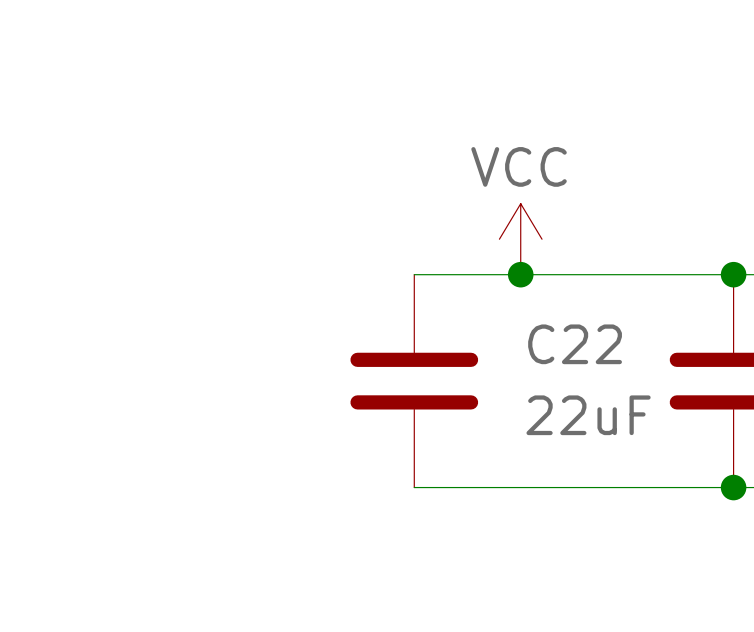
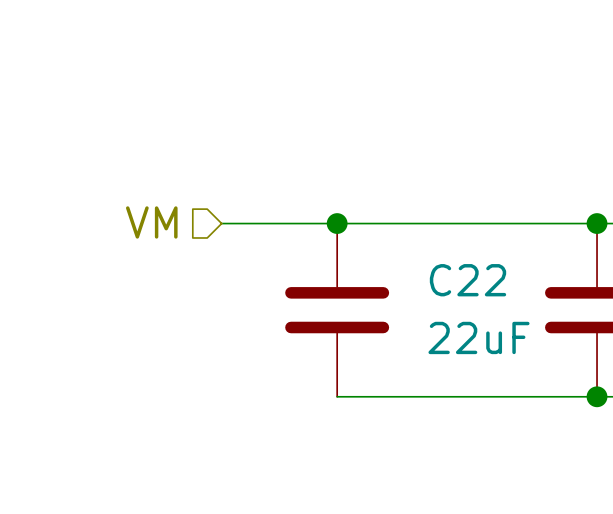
power symbol: VCC (520, 239) -> none
hierarchical label: none -> VM (151, 222)
wire: none -> (221, 223) (337, 223)
junction position: (520, 274) -> (337, 223)

